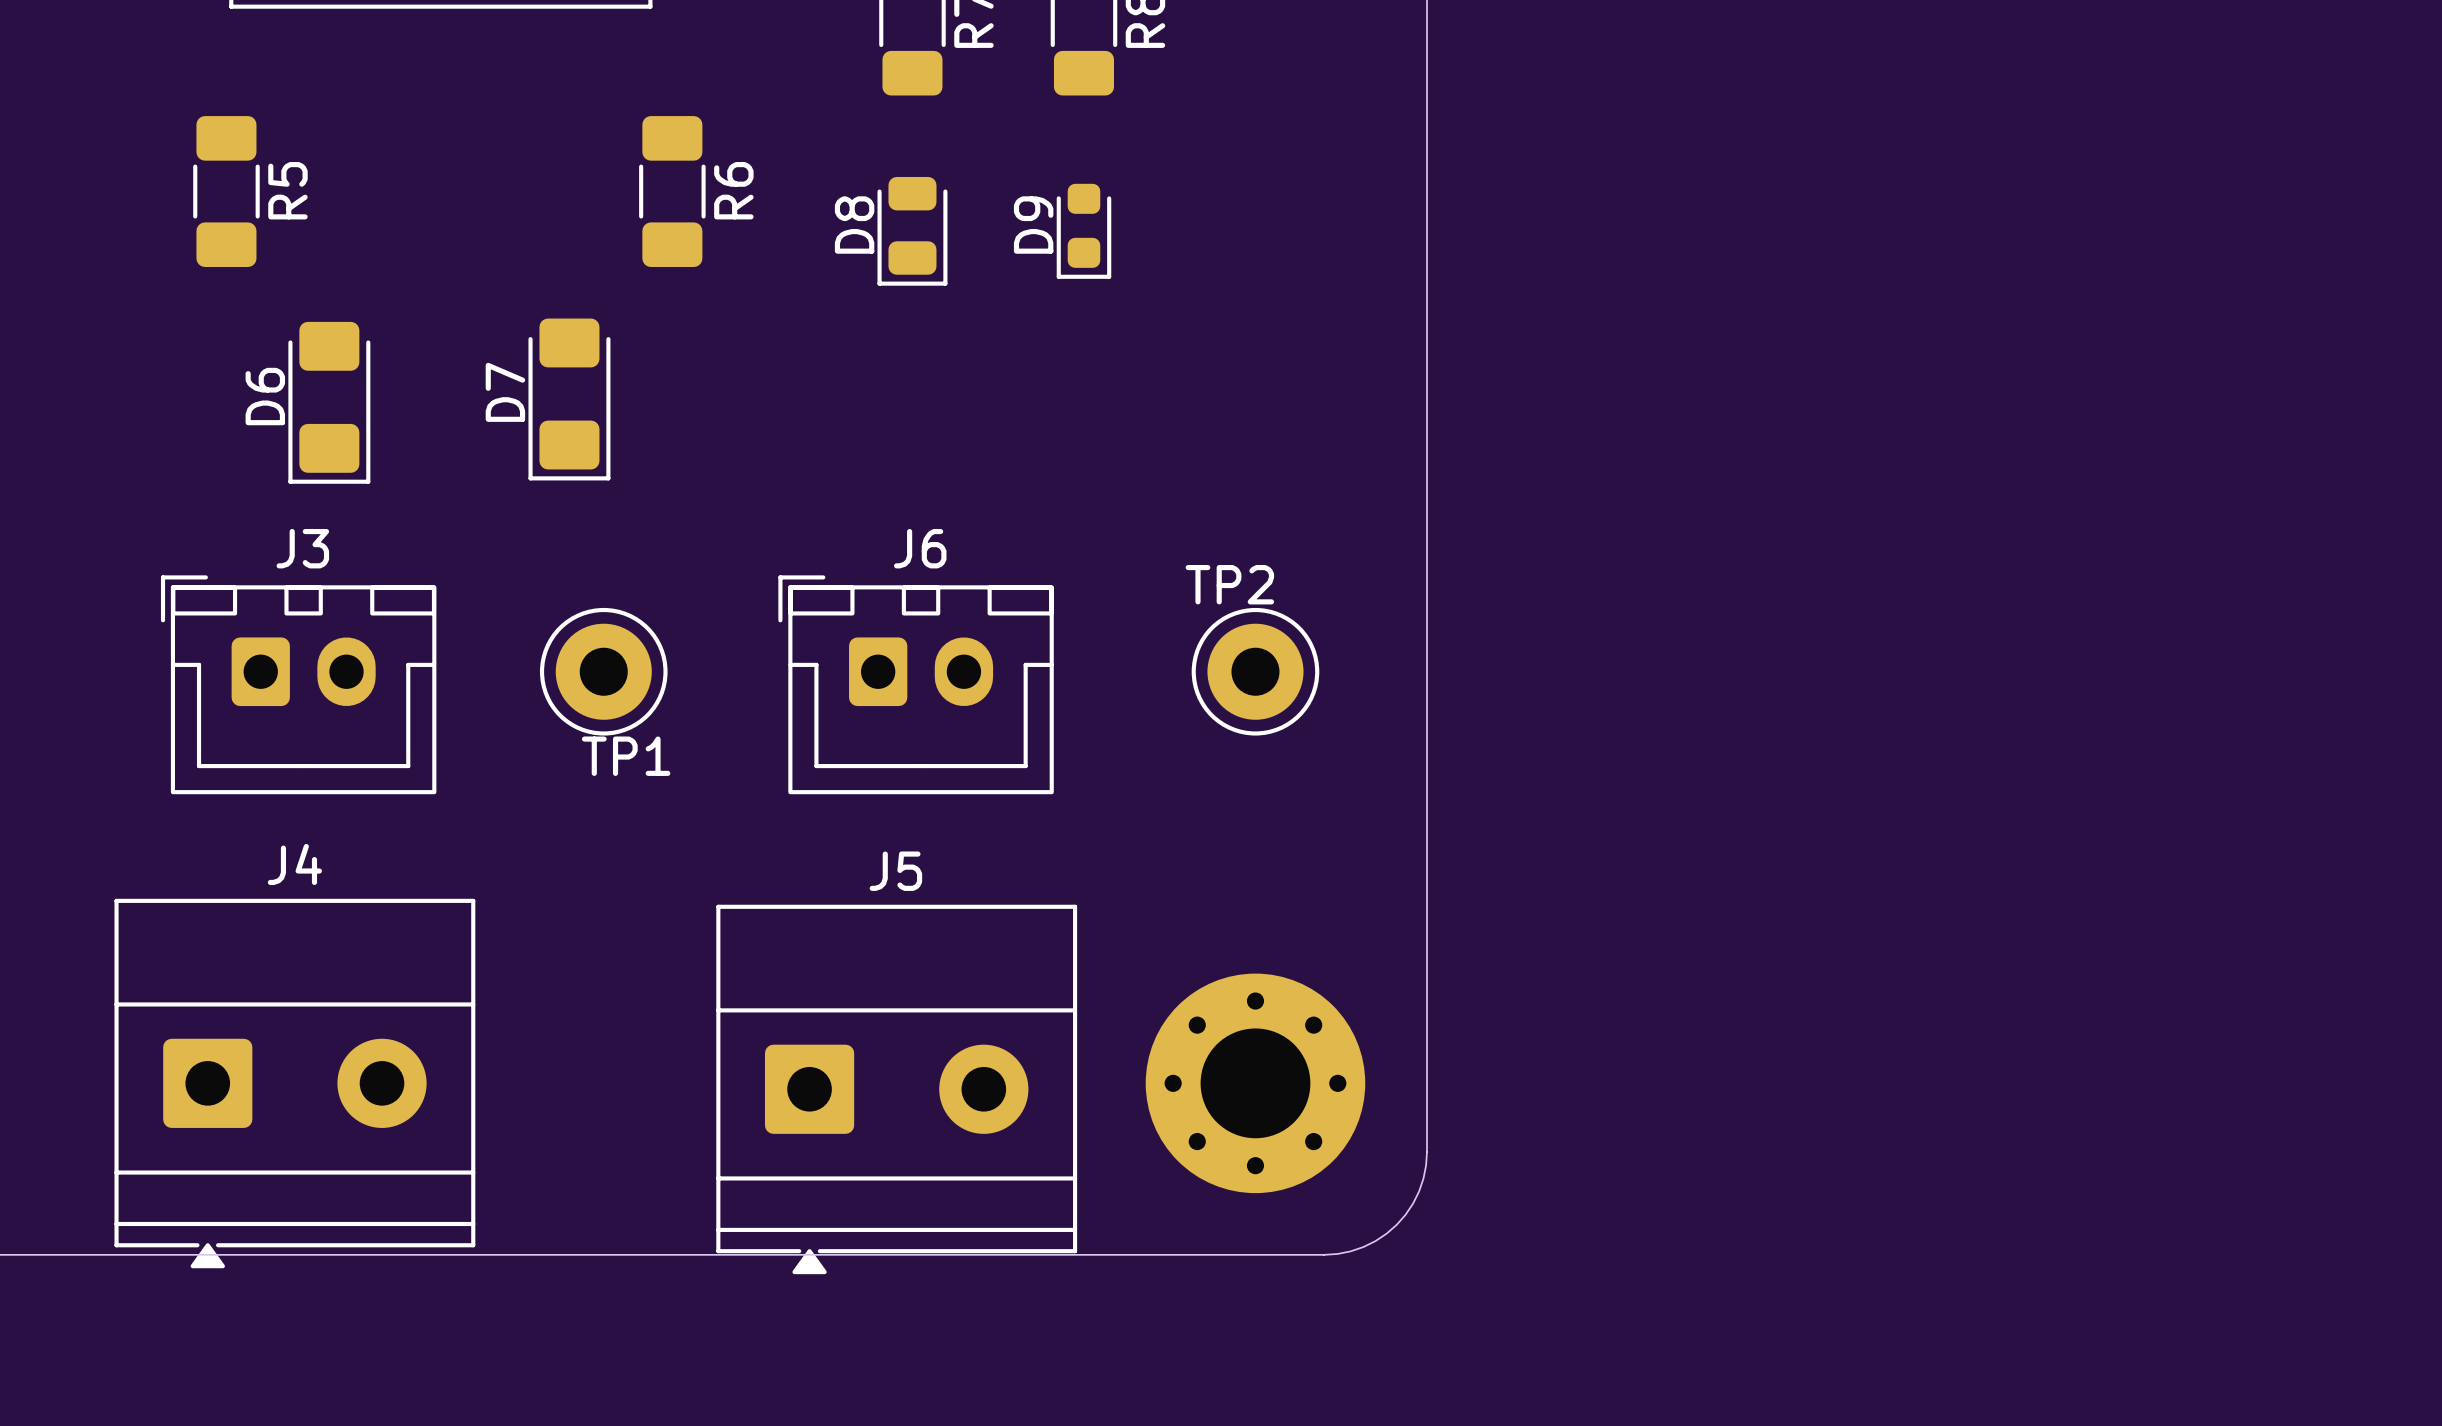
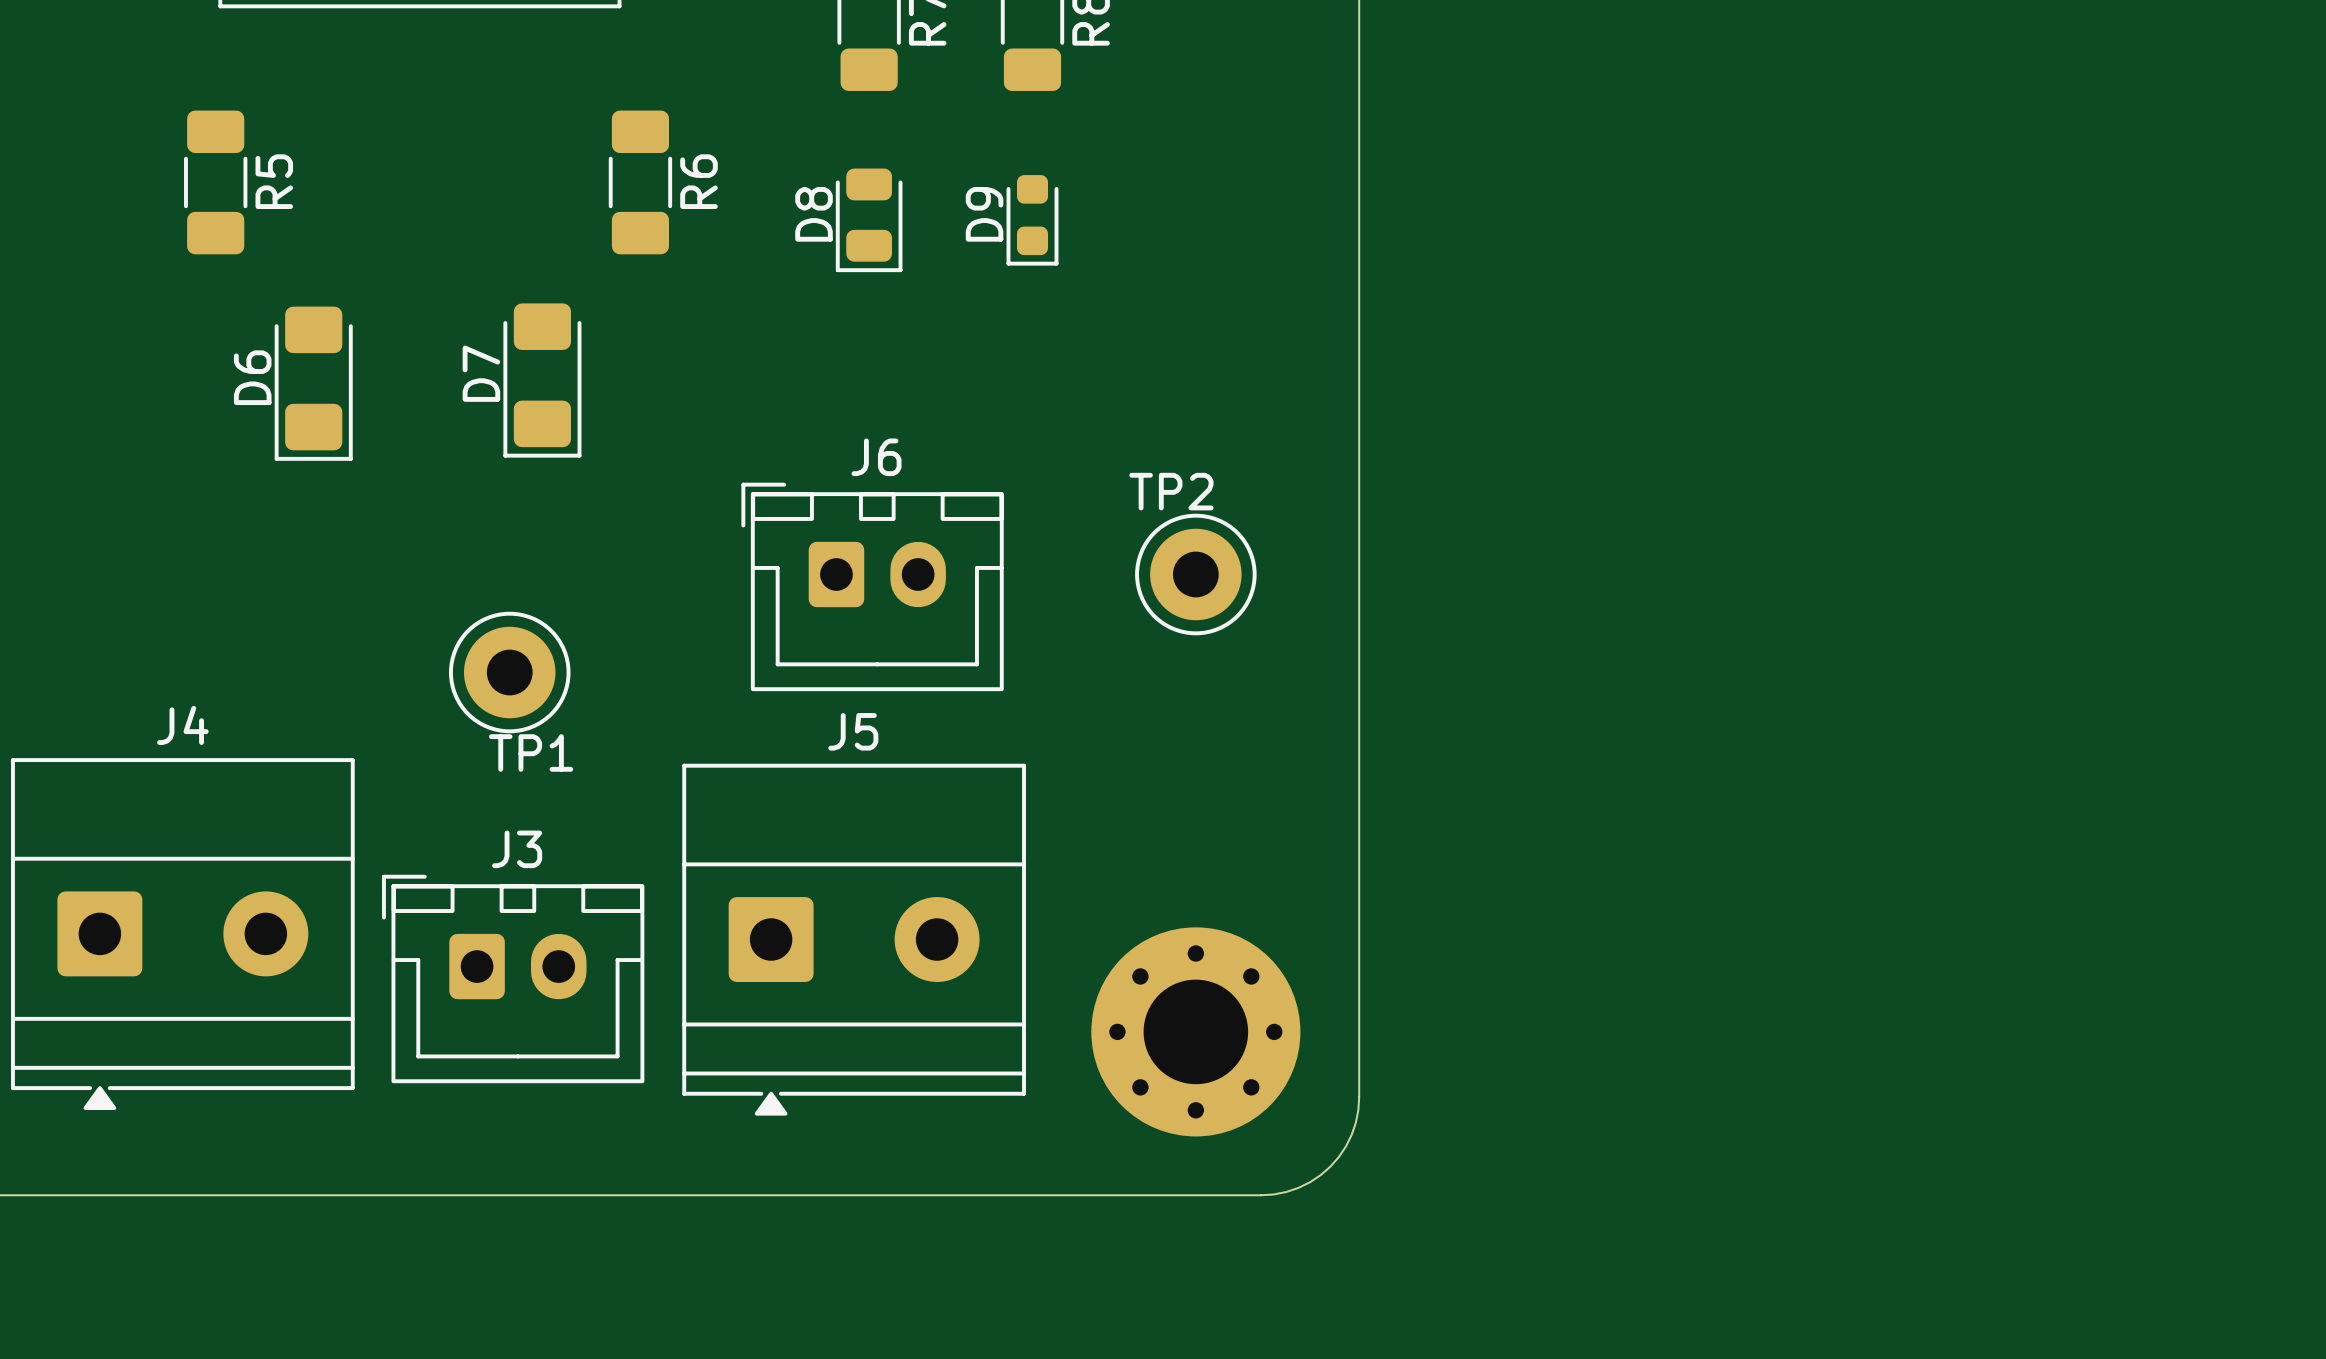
TP1 position: (603, 671) -> (509, 672)
TP2 position: (1255, 671) -> (1195, 574)
J3 position: (298, 684) -> (513, 978)
J6 position: (916, 684) -> (872, 586)
J4 position: (294, 1083) -> (182, 934)
J5 position: (896, 1089) -> (854, 939)

